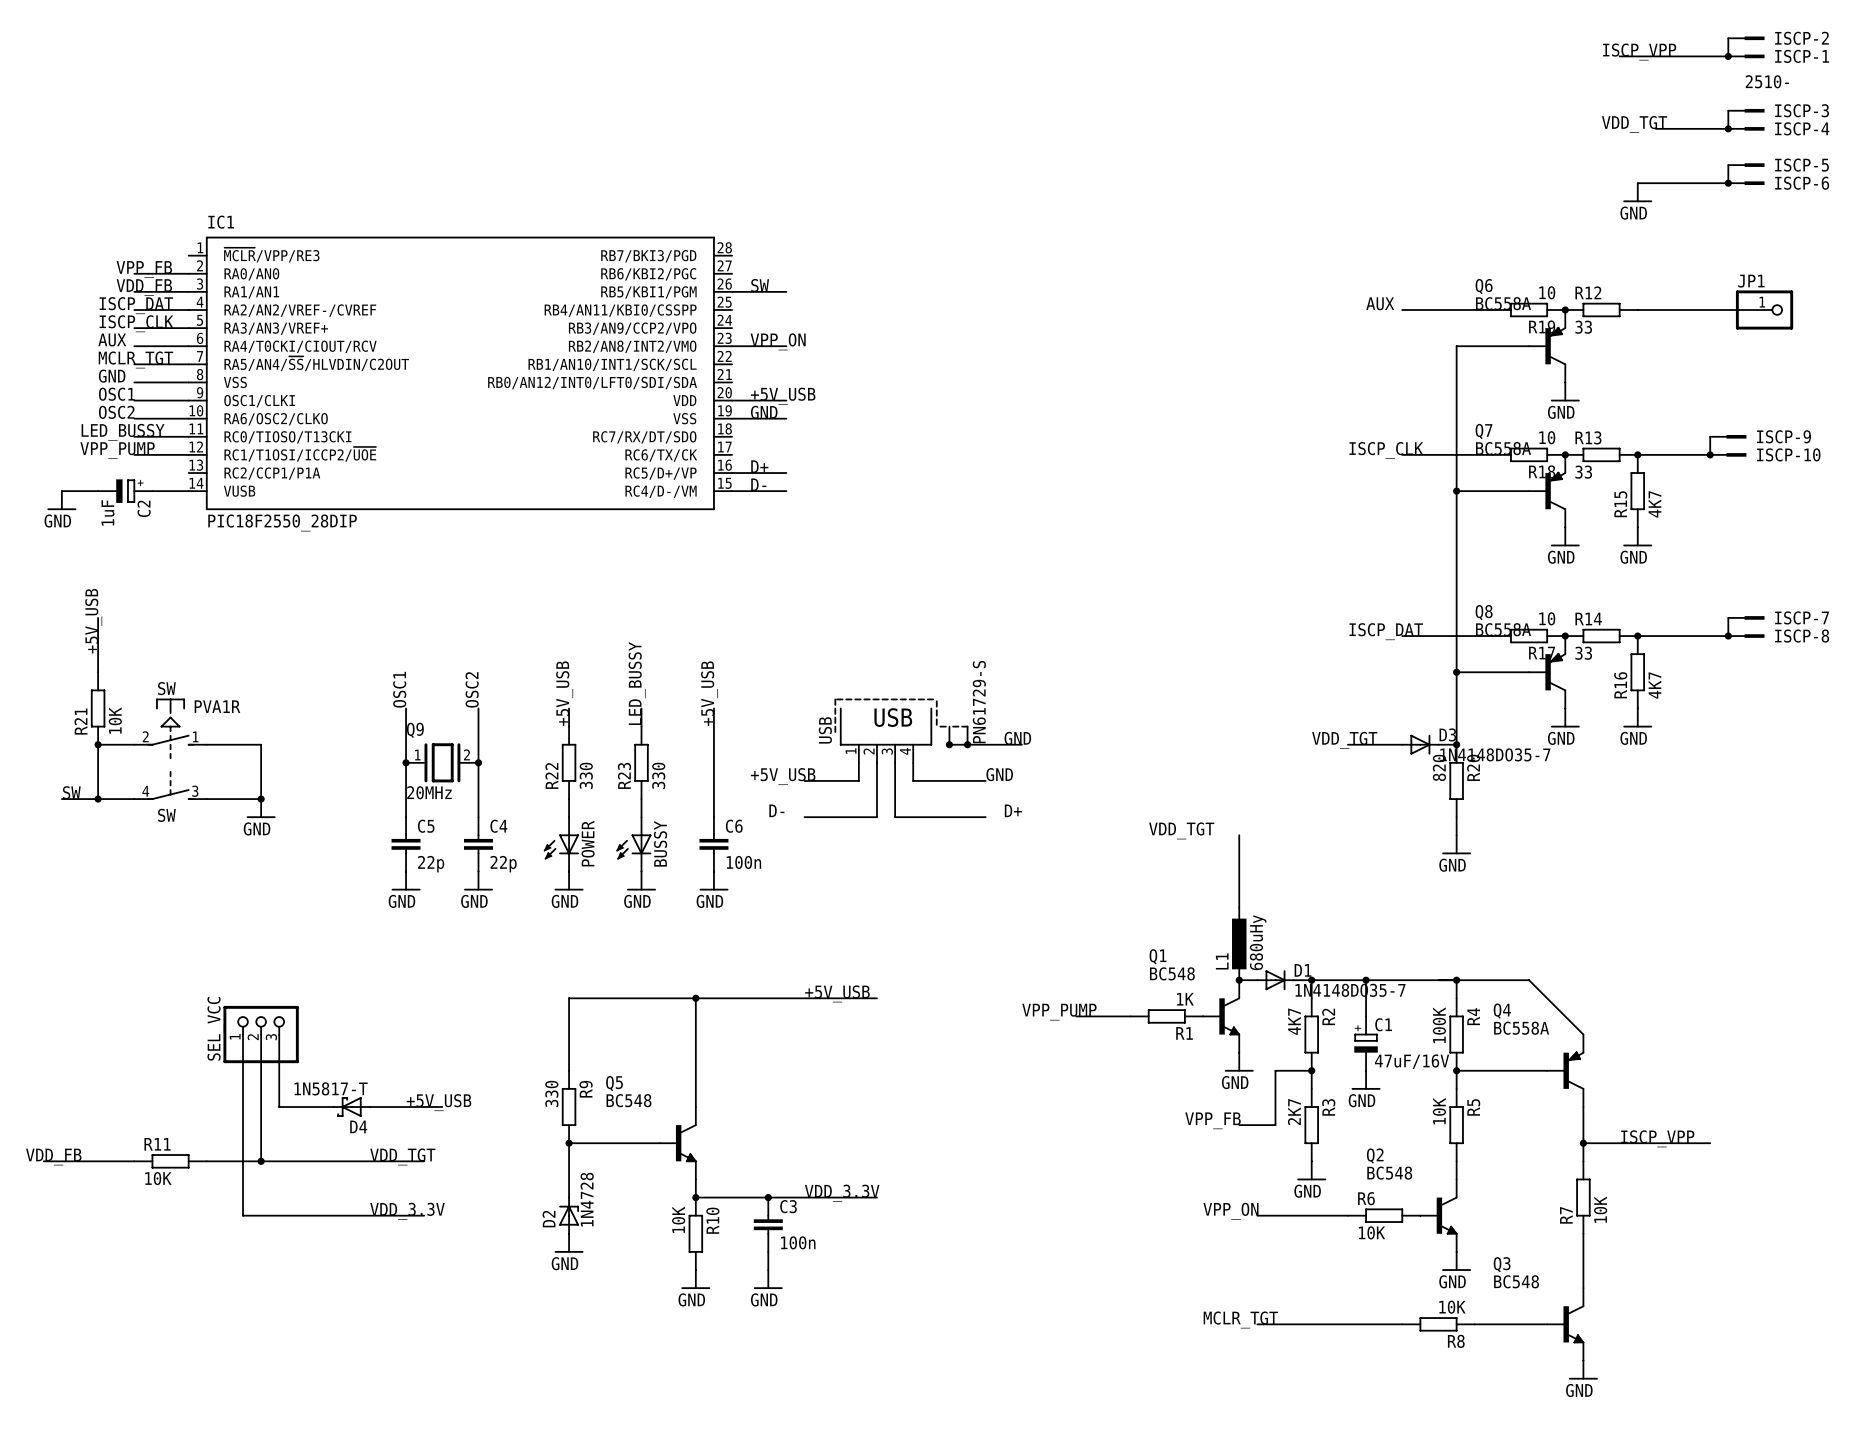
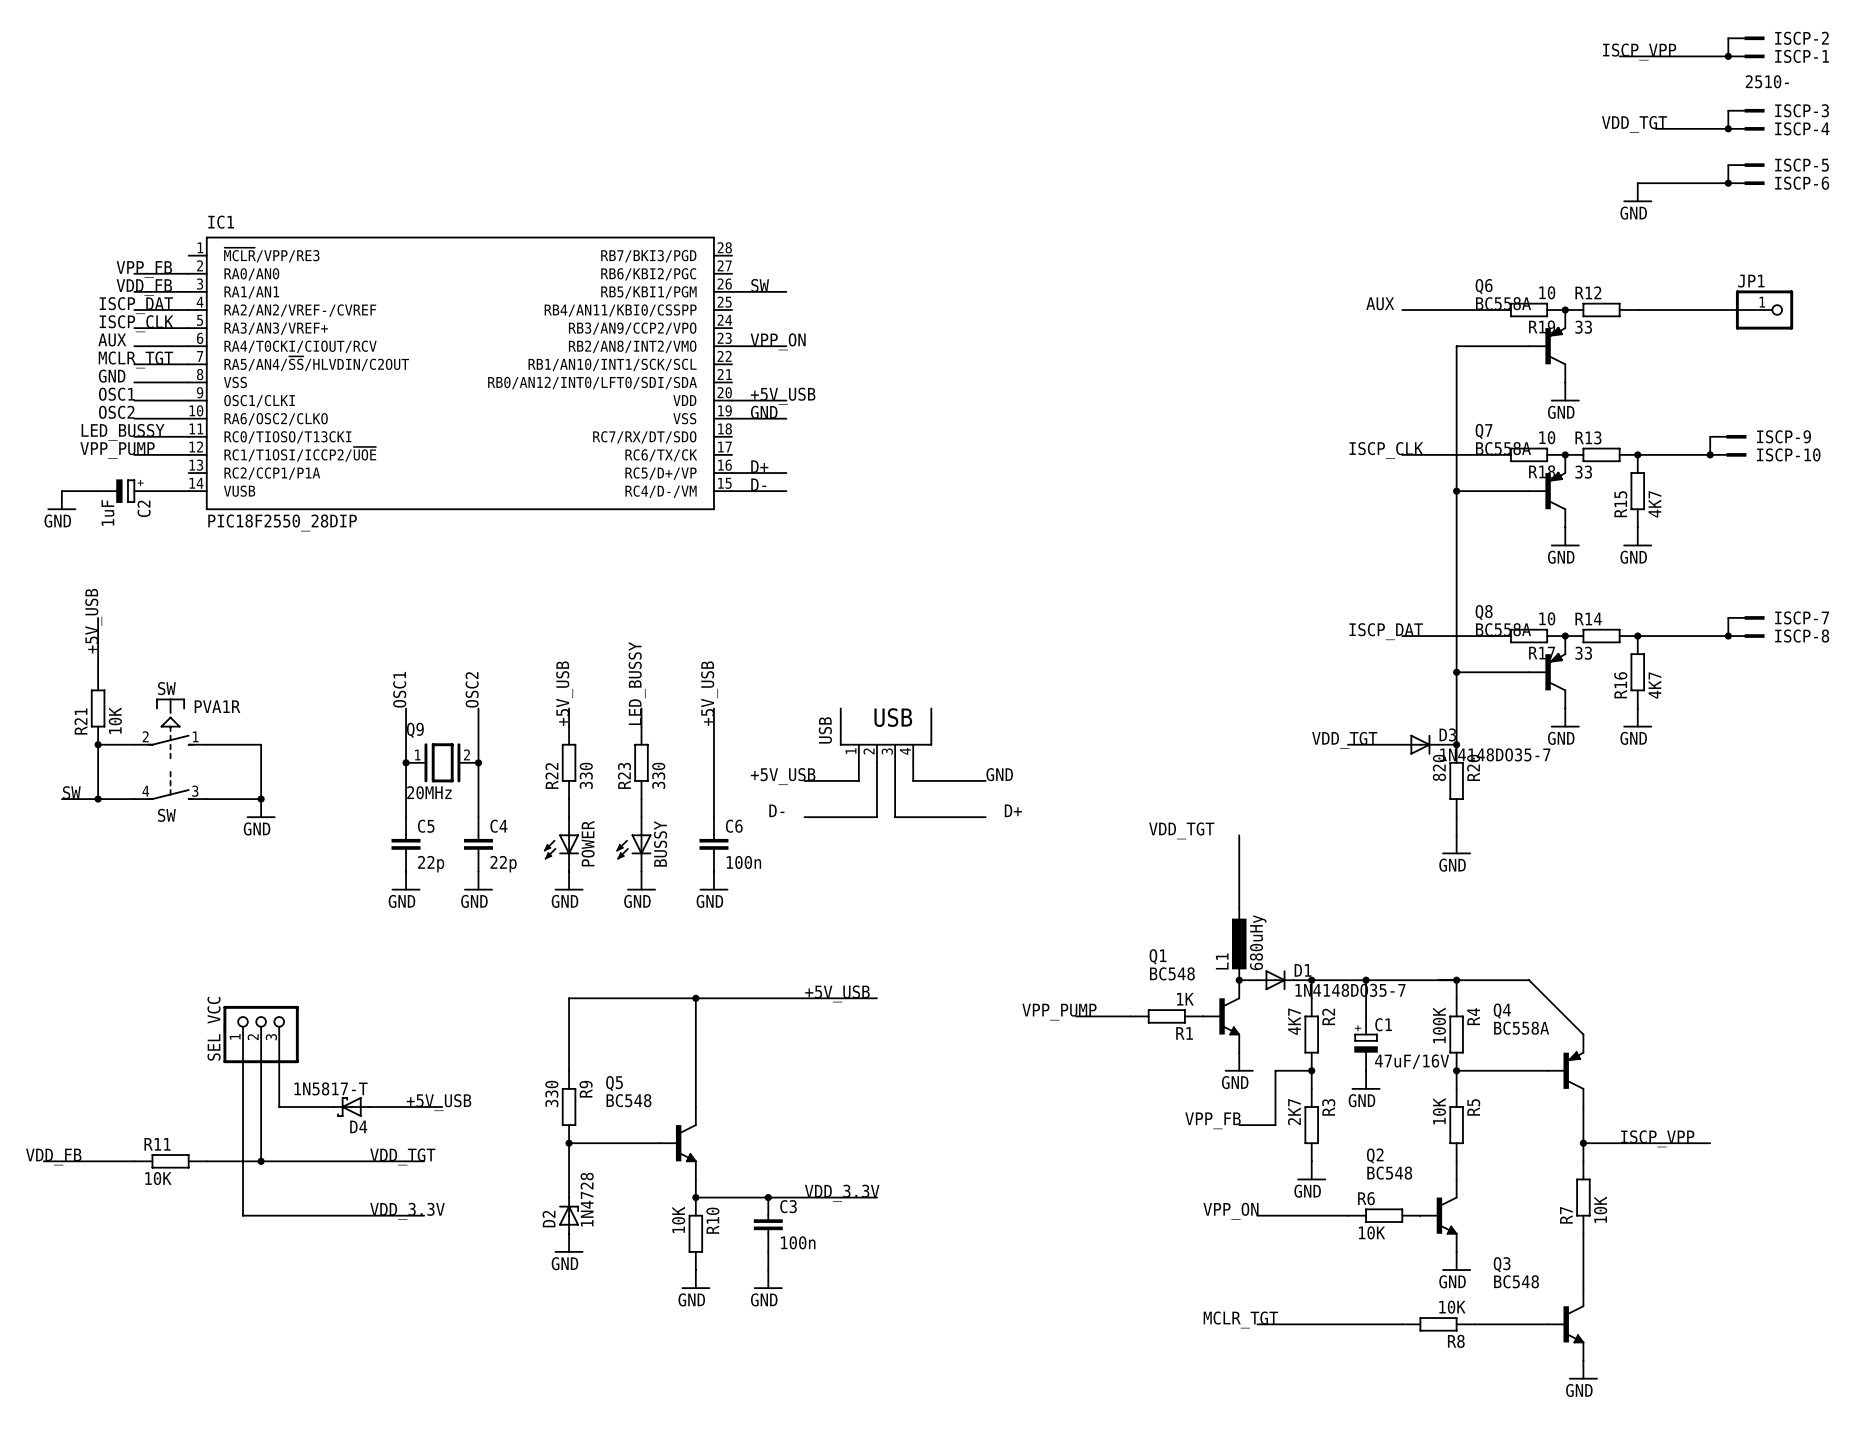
USB: PN61729-S (901, 730) -> none
USB: none -> (886, 735)
label: GND (1017, 738) -> none
wire: (949, 744) (1021, 744) -> none
junction: (949, 744) -> none
junction: (967, 744) -> none

